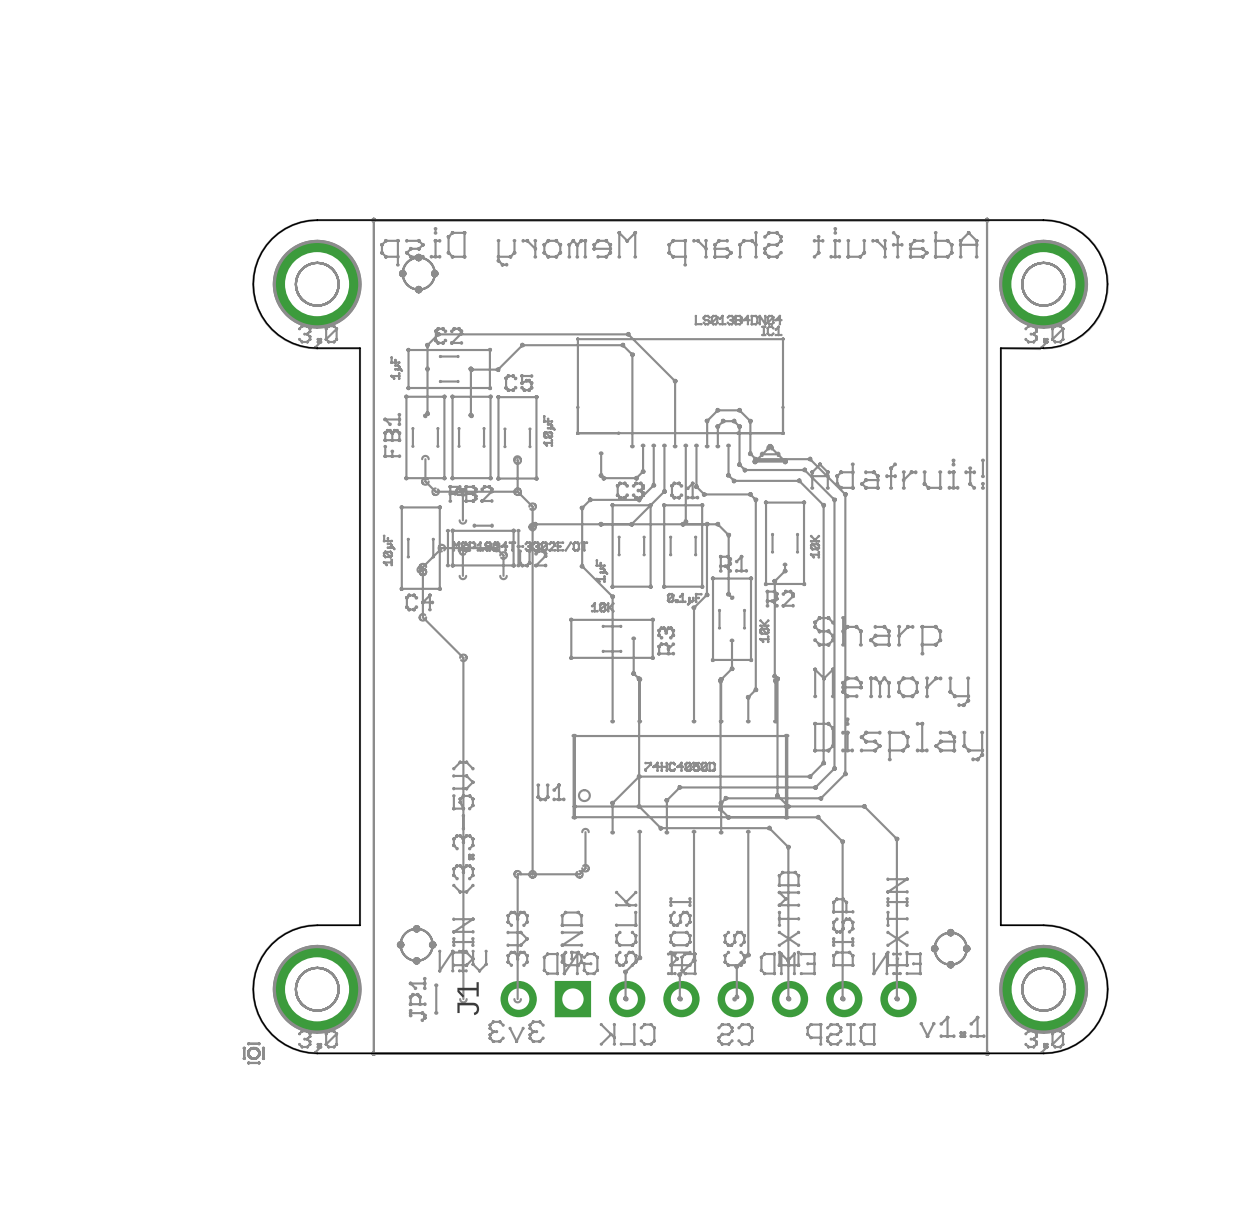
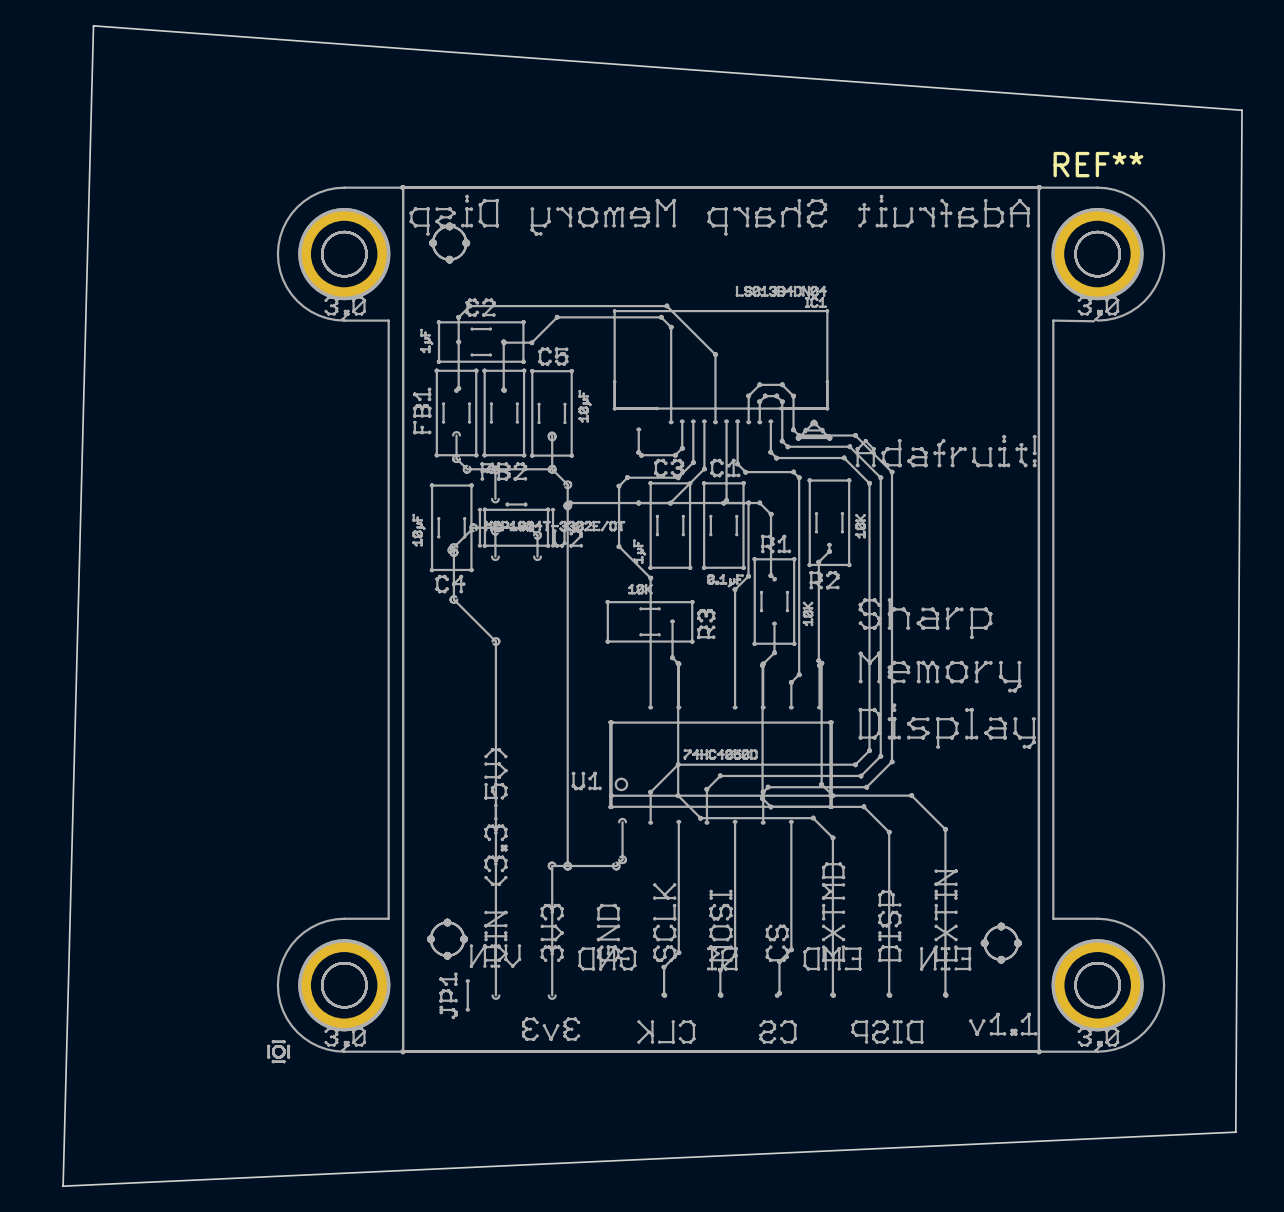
REF** name: none -> REF** (1098, 164)
board edge: (317, 220) (1043, 220) (1067, 225) (1088, 238) (1102, 259) (1107, 284) (1105, 300) (1094, 323) (1082, 334) (1059, 346) (1043, 348) (1000, 348) (1000, 925) (1043, 925) (1060, 927) (1082, 938) (1094, 950) (1105, 972) (1107, 989) (1102, 1013) (1088, 1034) (1068, 1048) (1043, 1053) (317, 1053) (292, 1048) (272, 1034) (258, 1013) (253, 989) (255, 972) (266, 950) (278, 938) (300, 927) (317, 925) (359, 925) (359, 348) (308, 347) (285, 339) (272, 329) (261, 316) (255, 300) (253, 284) (258, 259) (272, 238) (292, 225) (317, 220) -> (93, 25) (63, 1186) (1235, 1132) (1242, 110) (93, 25)
J1: (708, 999) -> none

